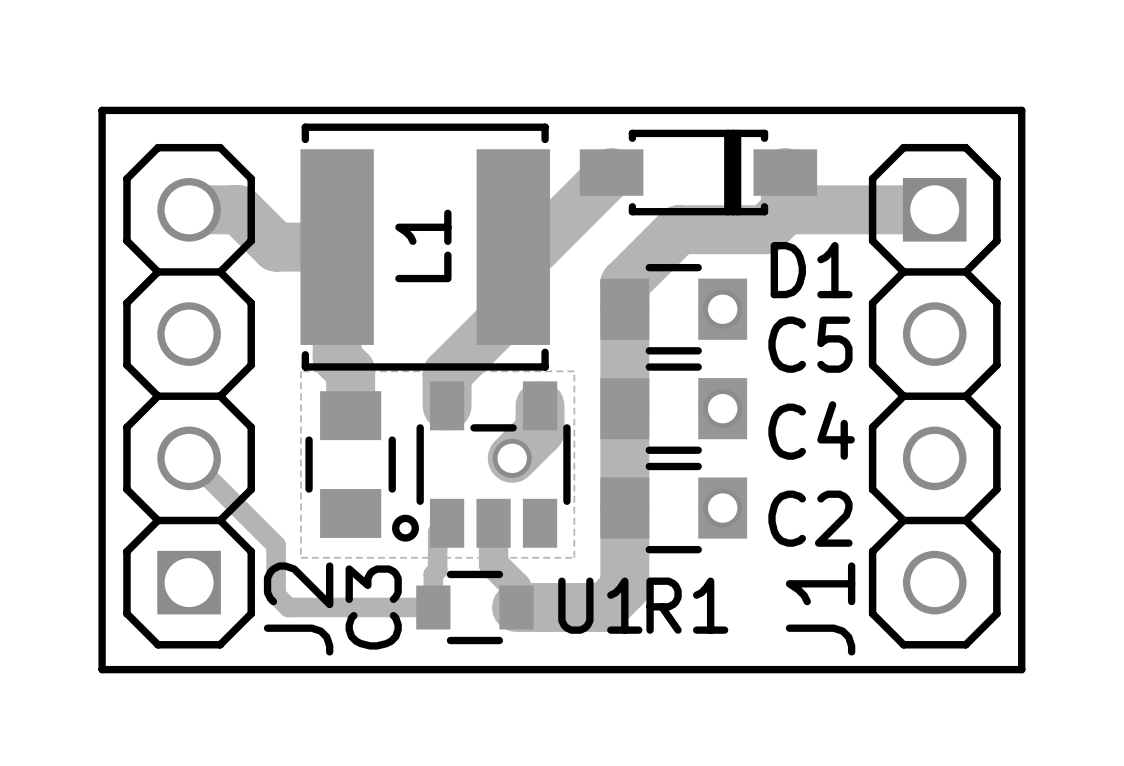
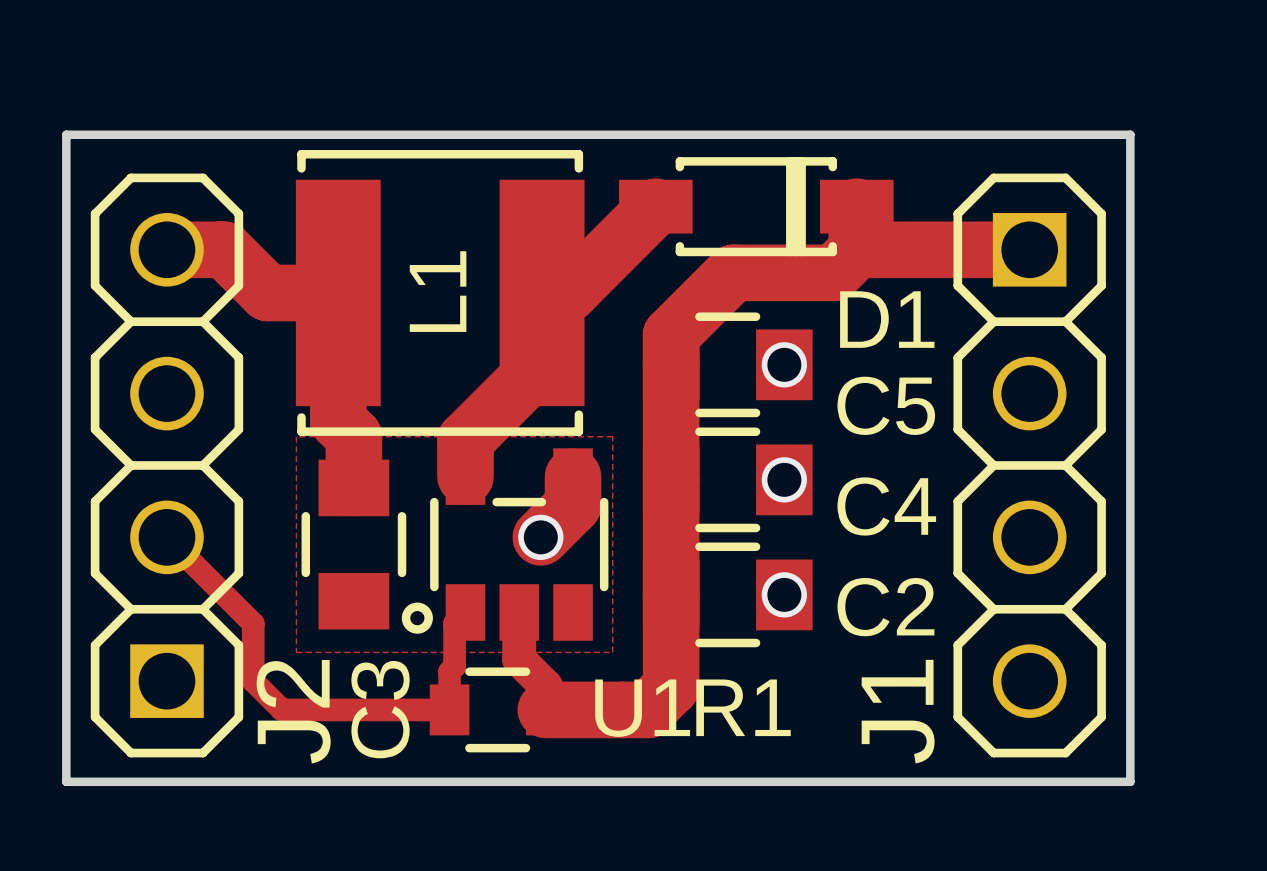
track: (263, 532) (276, 545) (276, 595) -> (253, 623) (253, 681) (267, 695)

